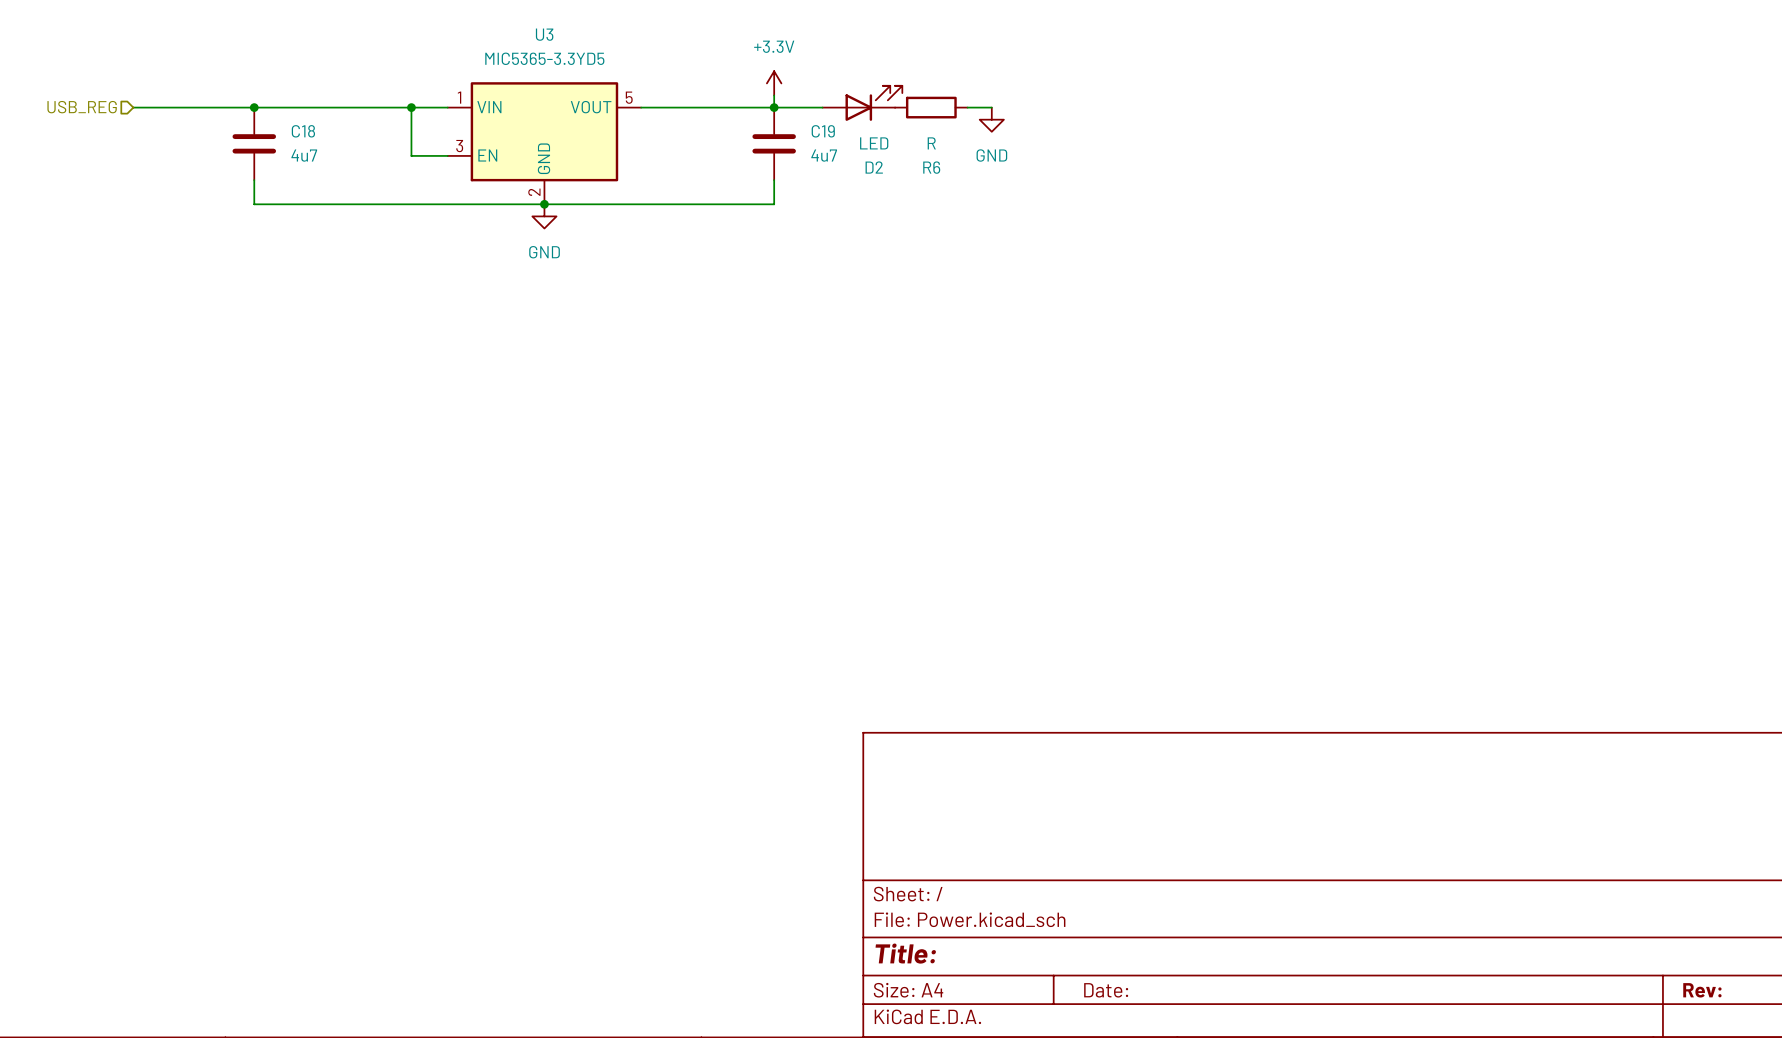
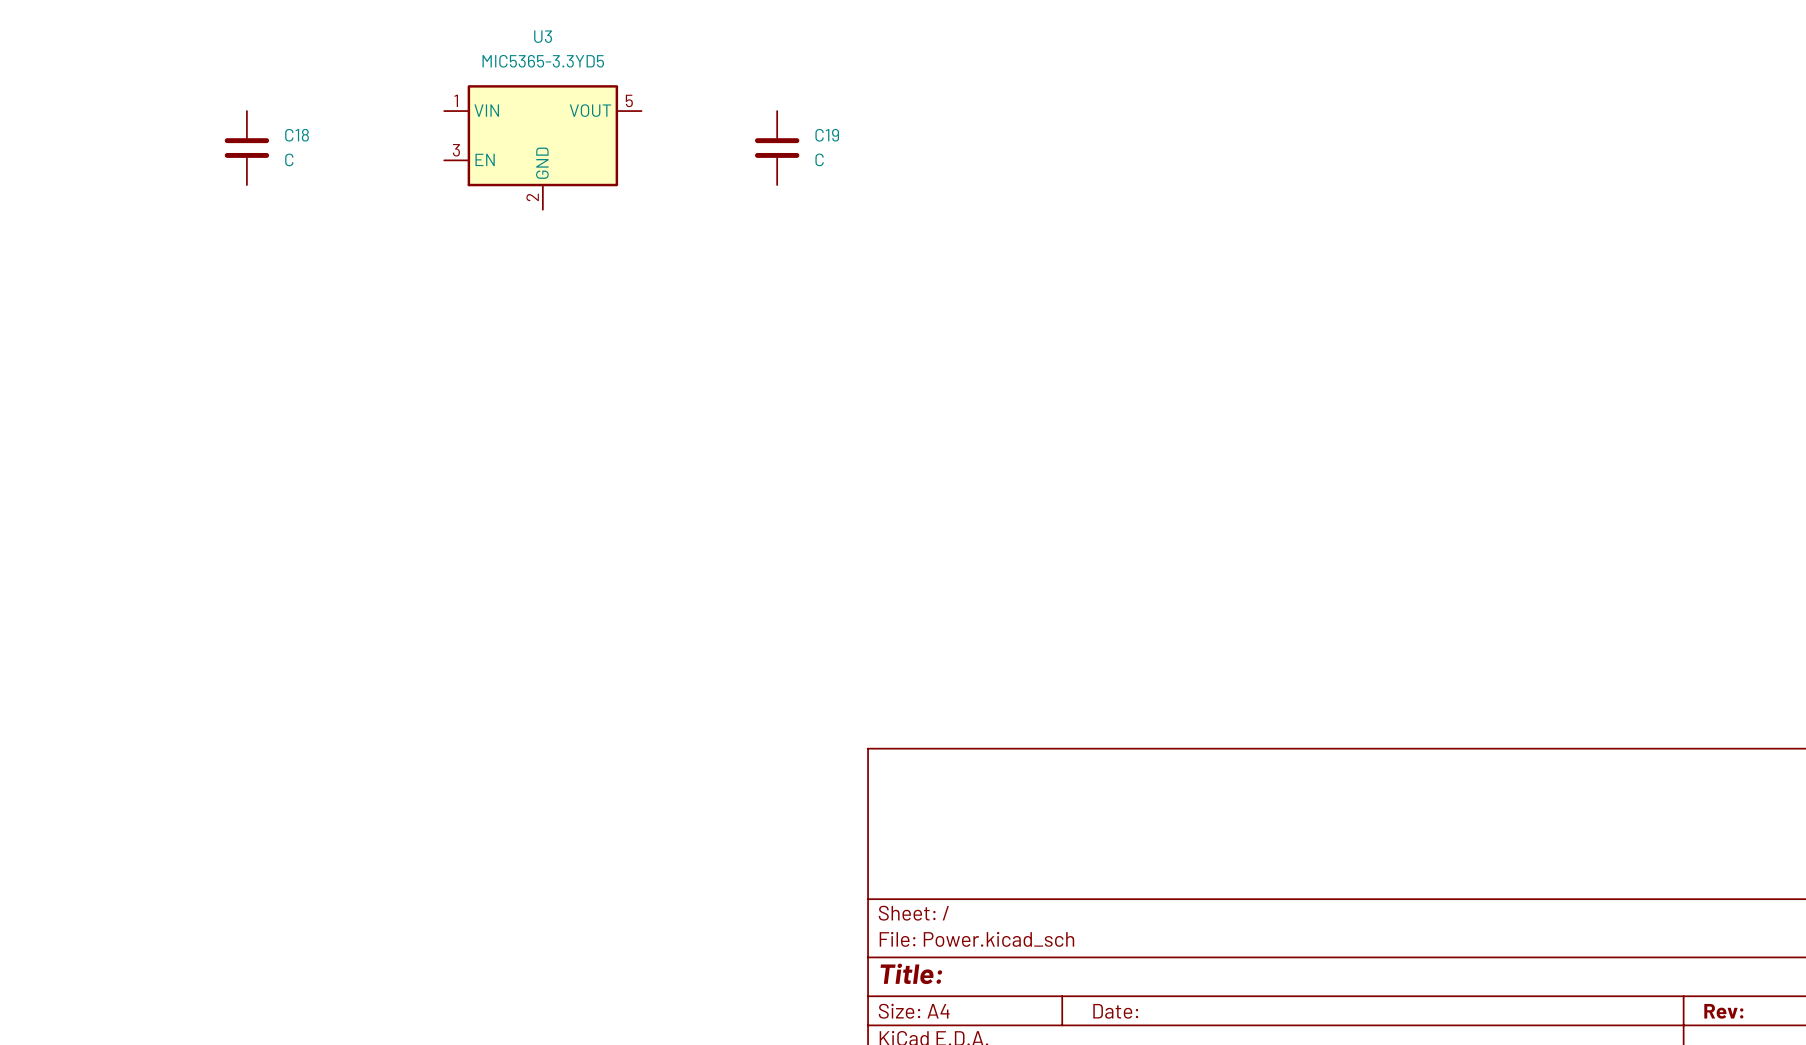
power symbol: +3.3V (774, 83) -> none
wire: (774, 95) (774, 107) -> none
D2: LED (862, 103) -> none
hierarchical label: USB_REG (82, 107) -> none
wire: (133, 107) (447, 107) -> none
junction: (254, 107) -> none
wire: (411, 107) (411, 155) (447, 155) -> none
junction: (411, 107) -> none
wire: (641, 107) (822, 107) -> none
junction: (774, 107) -> none
R6: R (931, 107) -> none
wire: (967, 107) (991, 107) -> none
power symbol: GND (991, 119) -> none
C18 value: 4u7 (304, 155) -> C (289, 159)
C19 value: 4u7 (824, 155) -> C (819, 159)
wire: (254, 180) (254, 204) (774, 204) (774, 180) -> none
junction: (544, 204) -> none
power symbol: GND (544, 216) -> none

